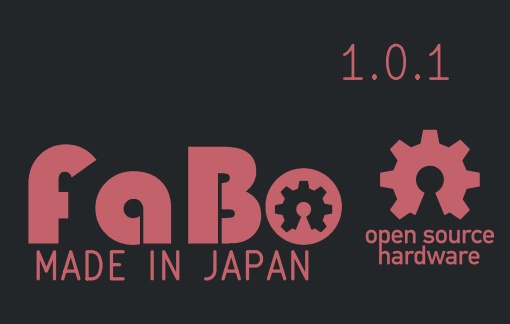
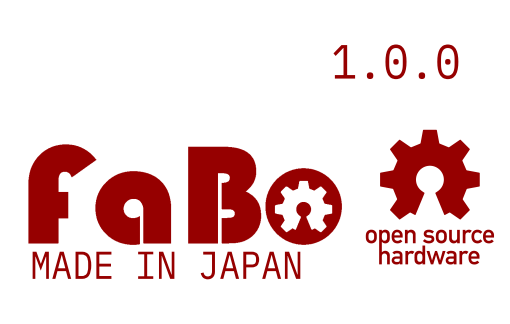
text: 1.0.1 (395, 61) -> 1.0.0 (395, 61)

